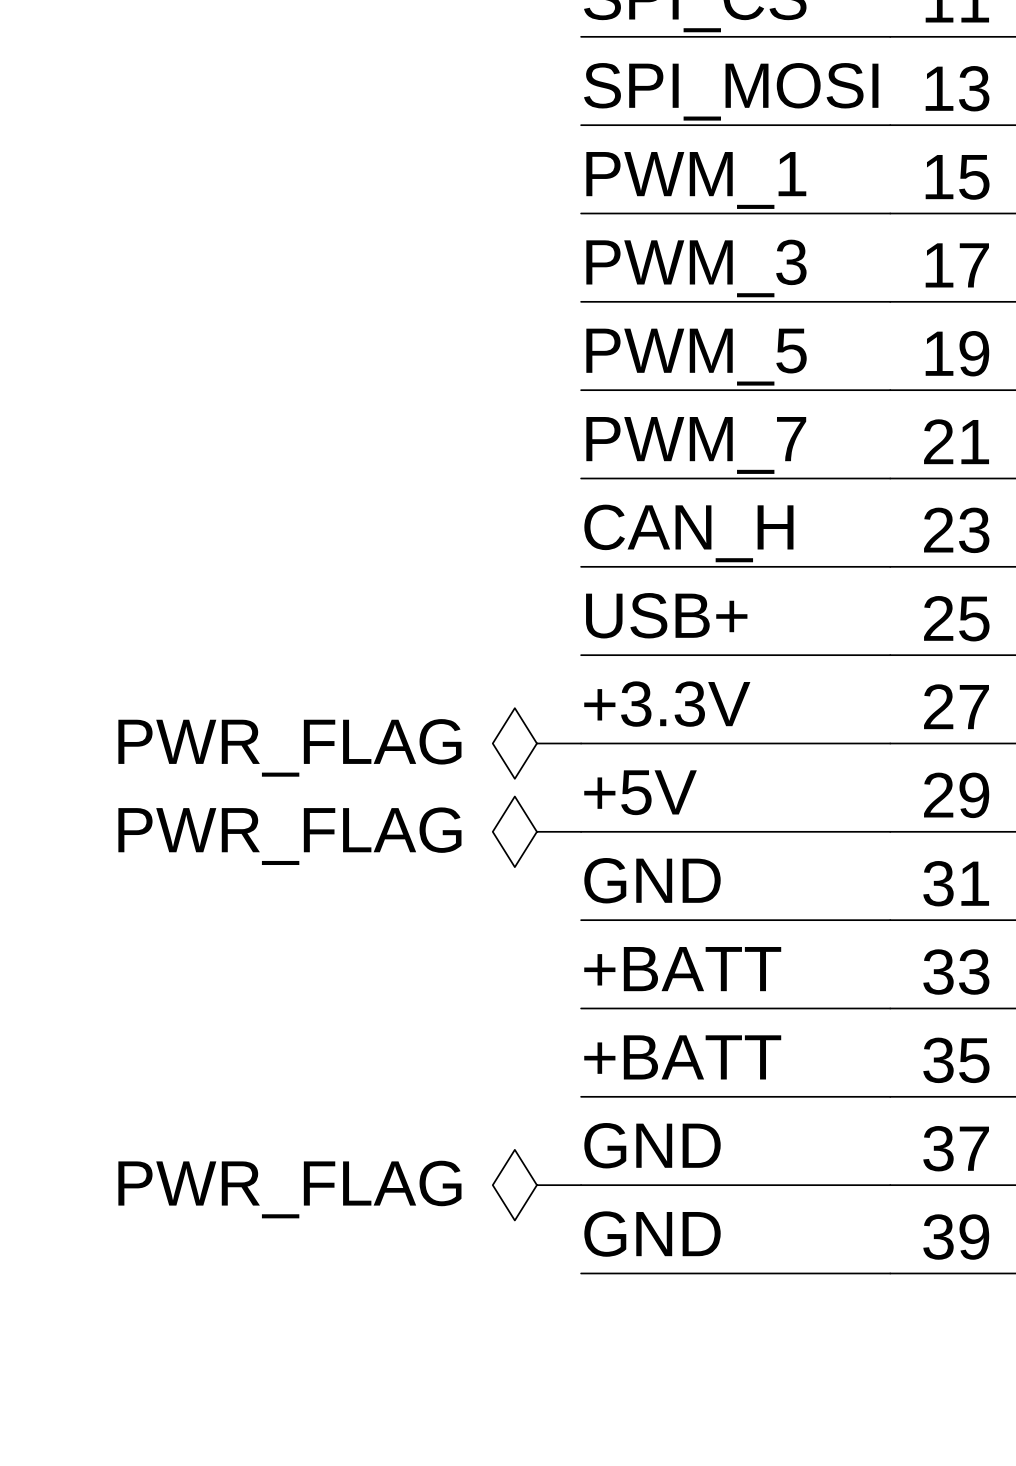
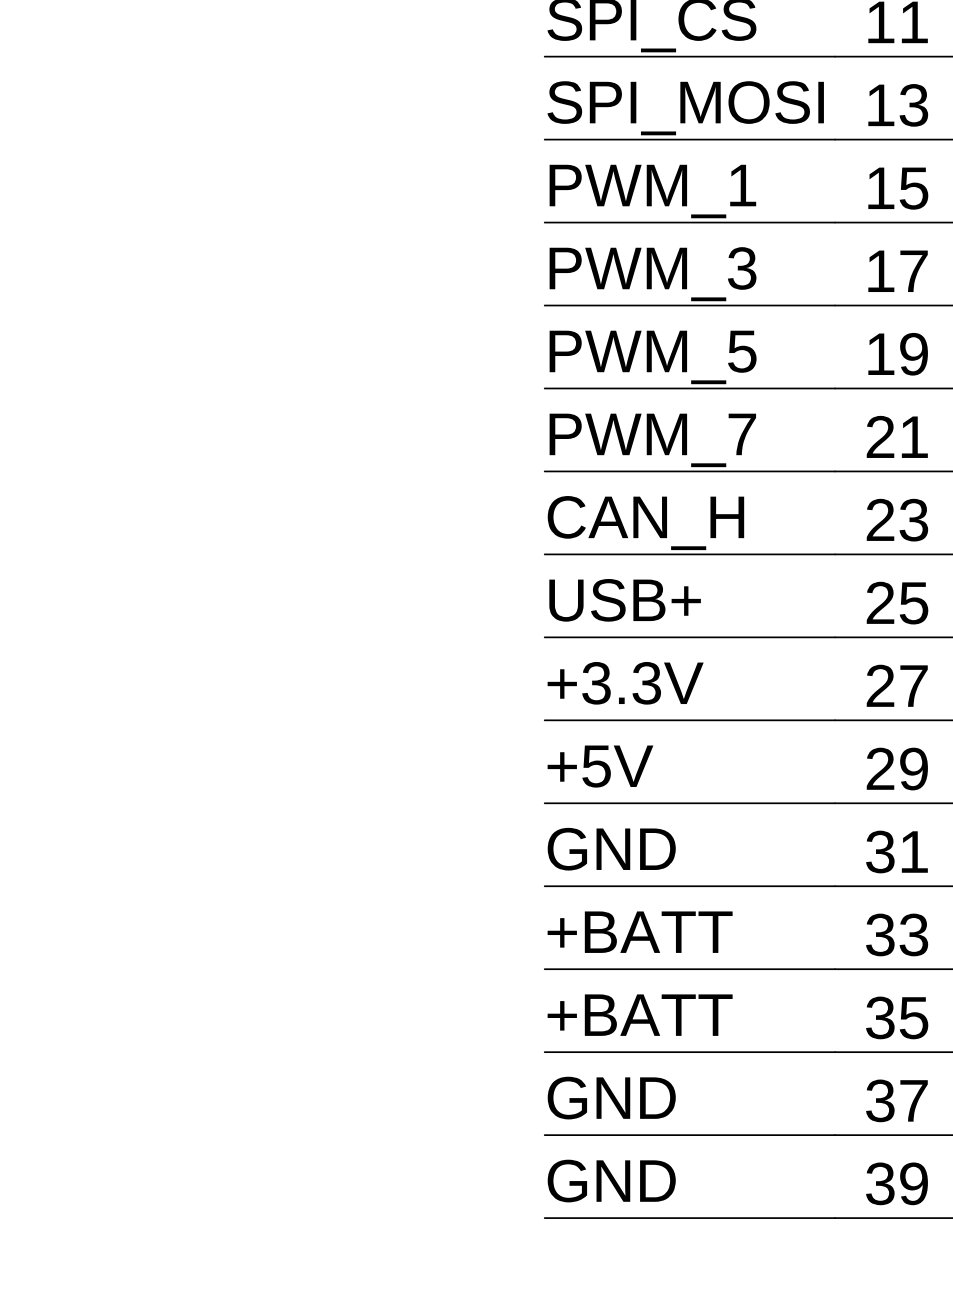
power symbol: PWR_FLAG (536, 743) -> none
power symbol: PWR_FLAG (536, 831) -> none
power symbol: PWR_FLAG (536, 1185) -> none

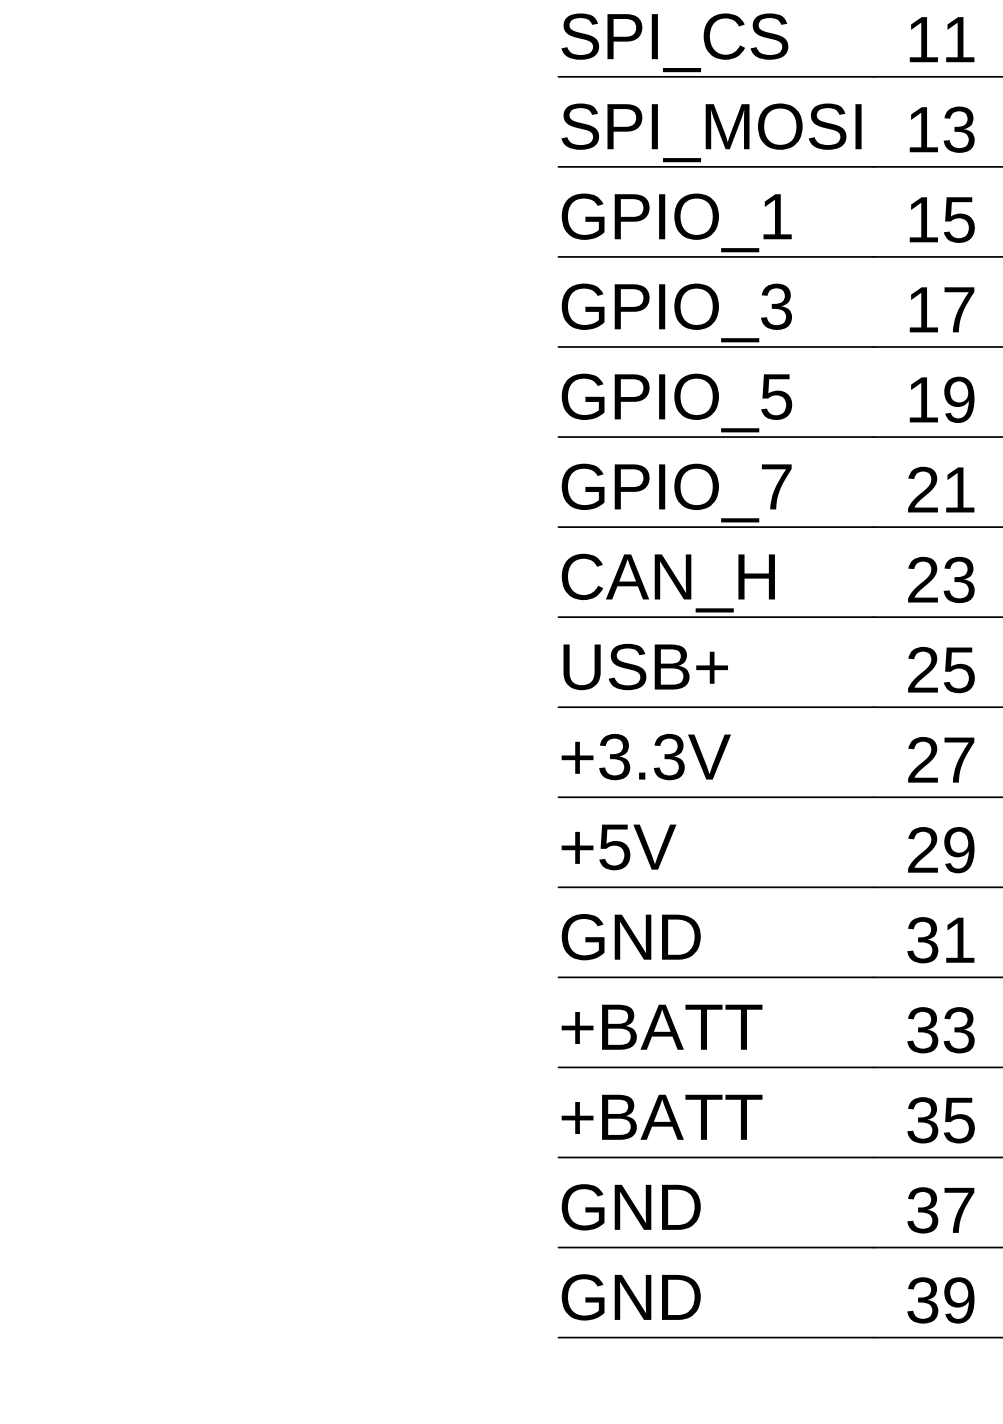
label: PWM_1 (652, 191) -> GPIO_1 (676, 222)
label: PWM_3 (653, 274) -> GPIO_3 (676, 312)
label: PWM_5 (653, 357) -> GPIO_5 (676, 403)
label: PWM_7 (652, 440) -> GPIO_7 (676, 493)

